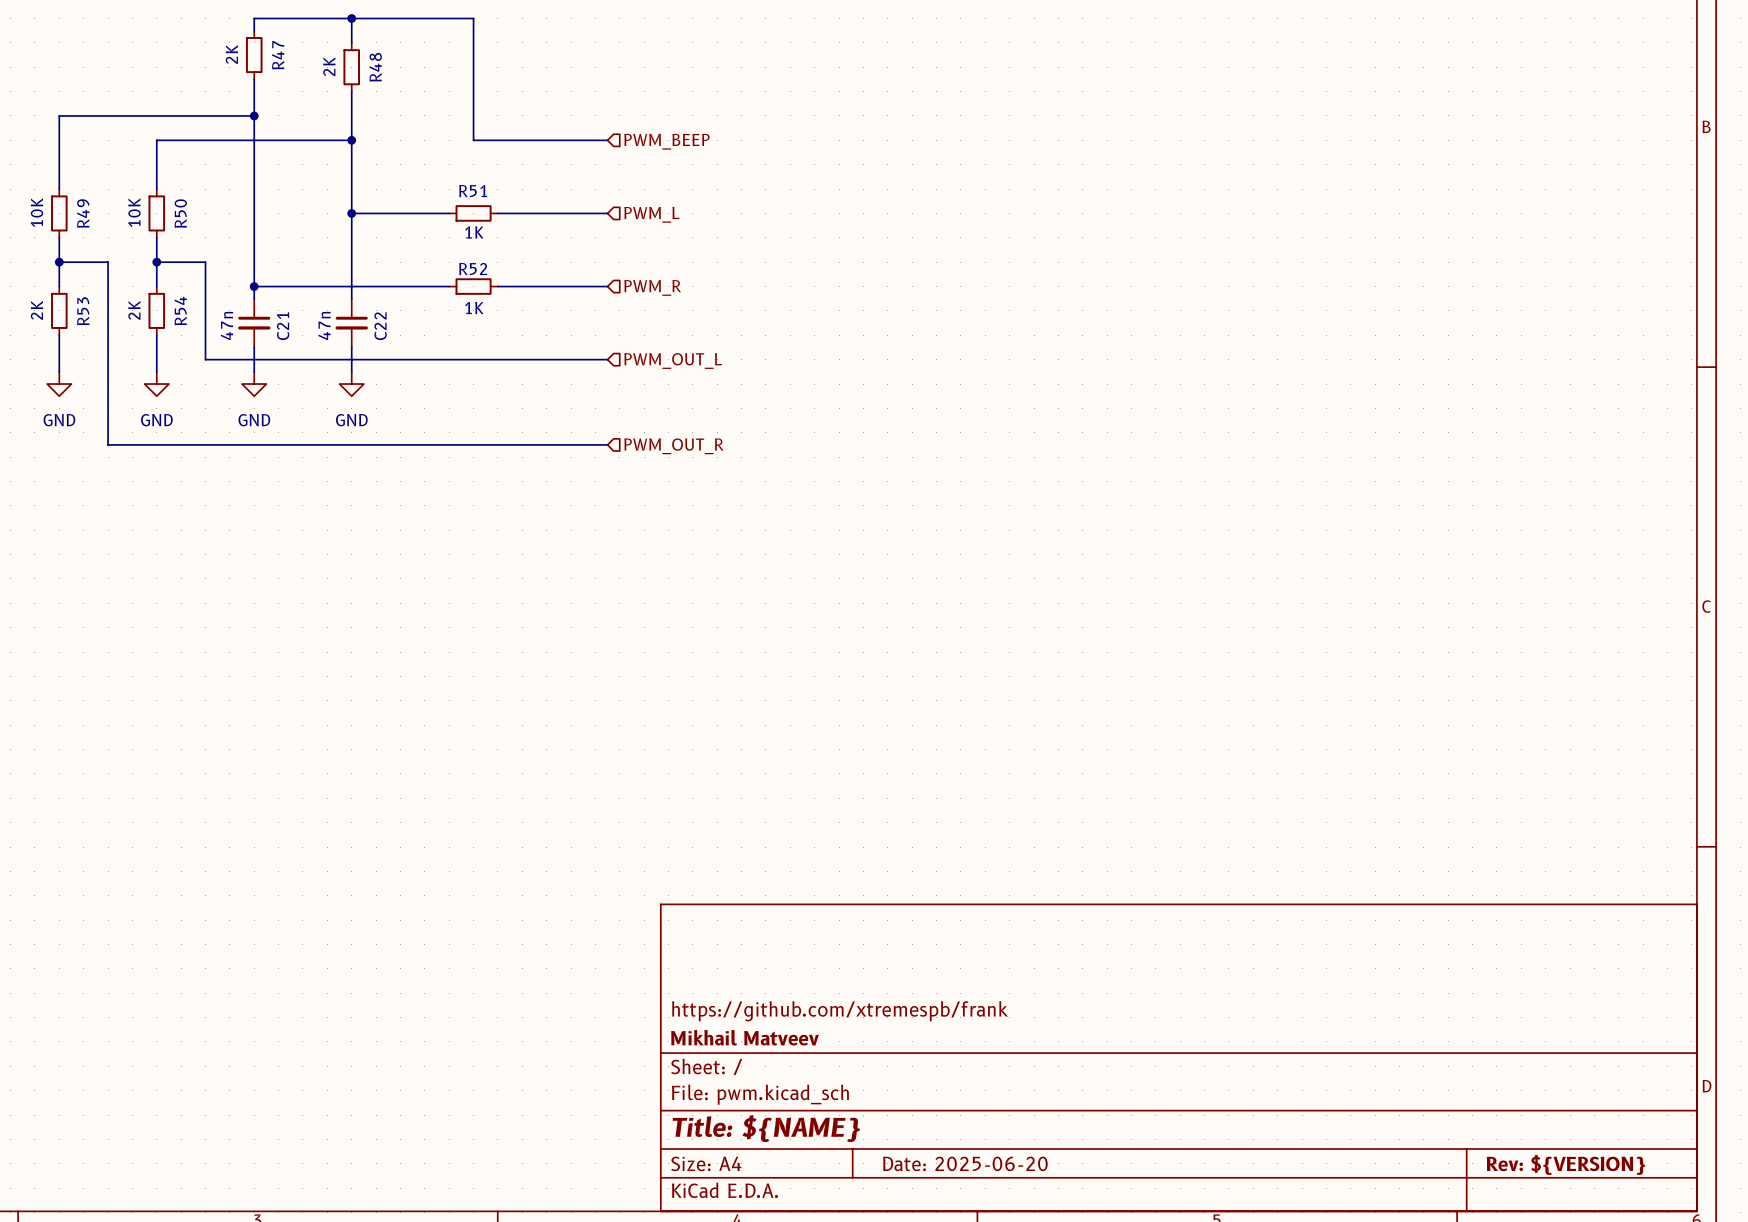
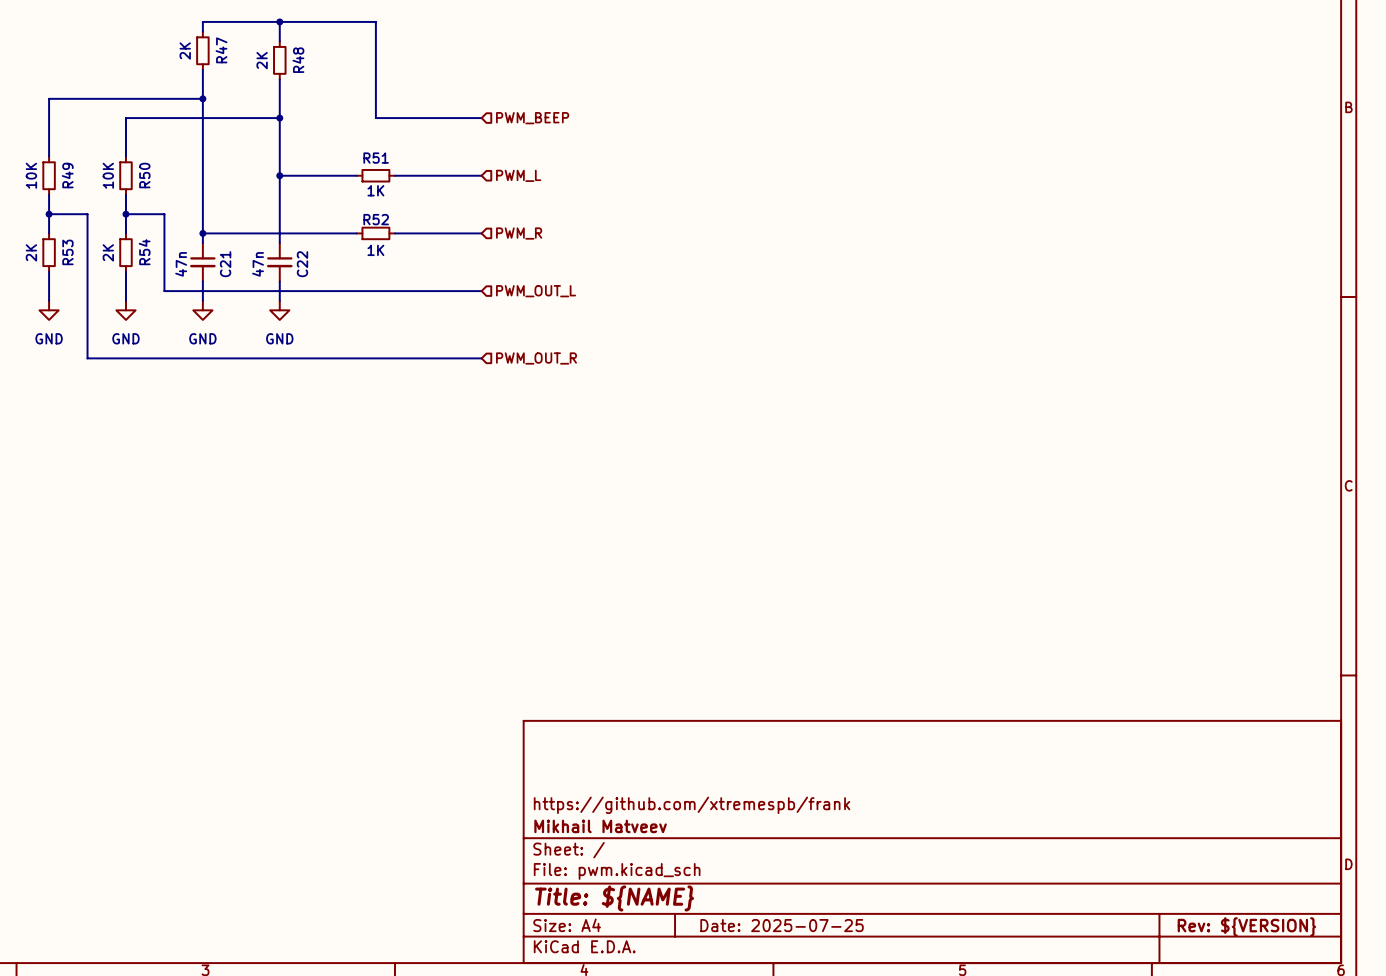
title block: Date: 2025-06-20 (965, 1163) -> Date: 2025-07-25 (782, 925)

